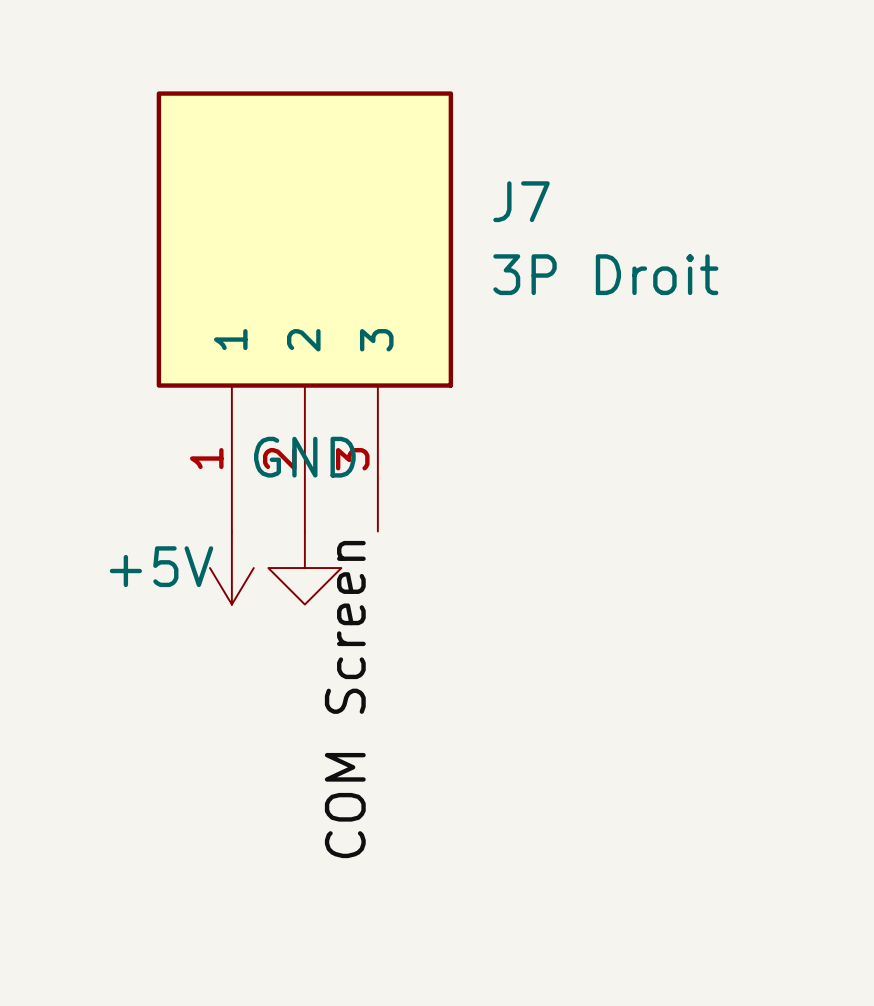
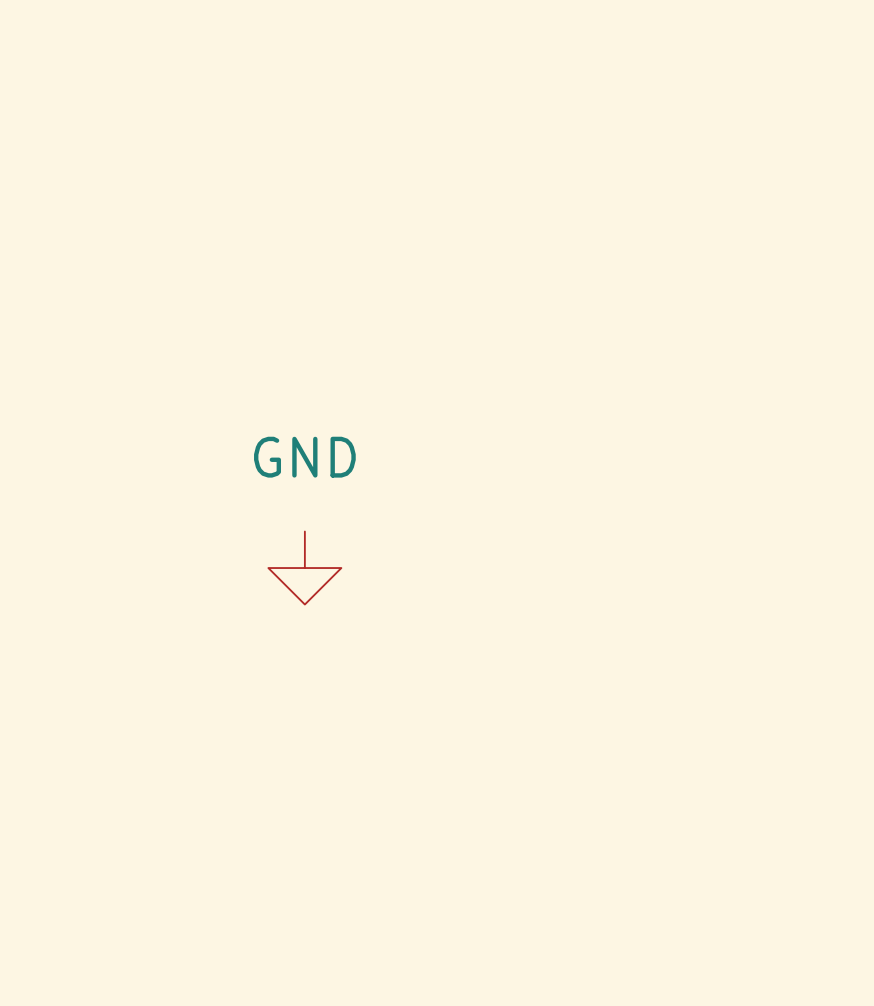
J7: (304, 311) -> none
power symbol: +5V (231, 568) -> none
label: COM Screen (345, 699) -> none

